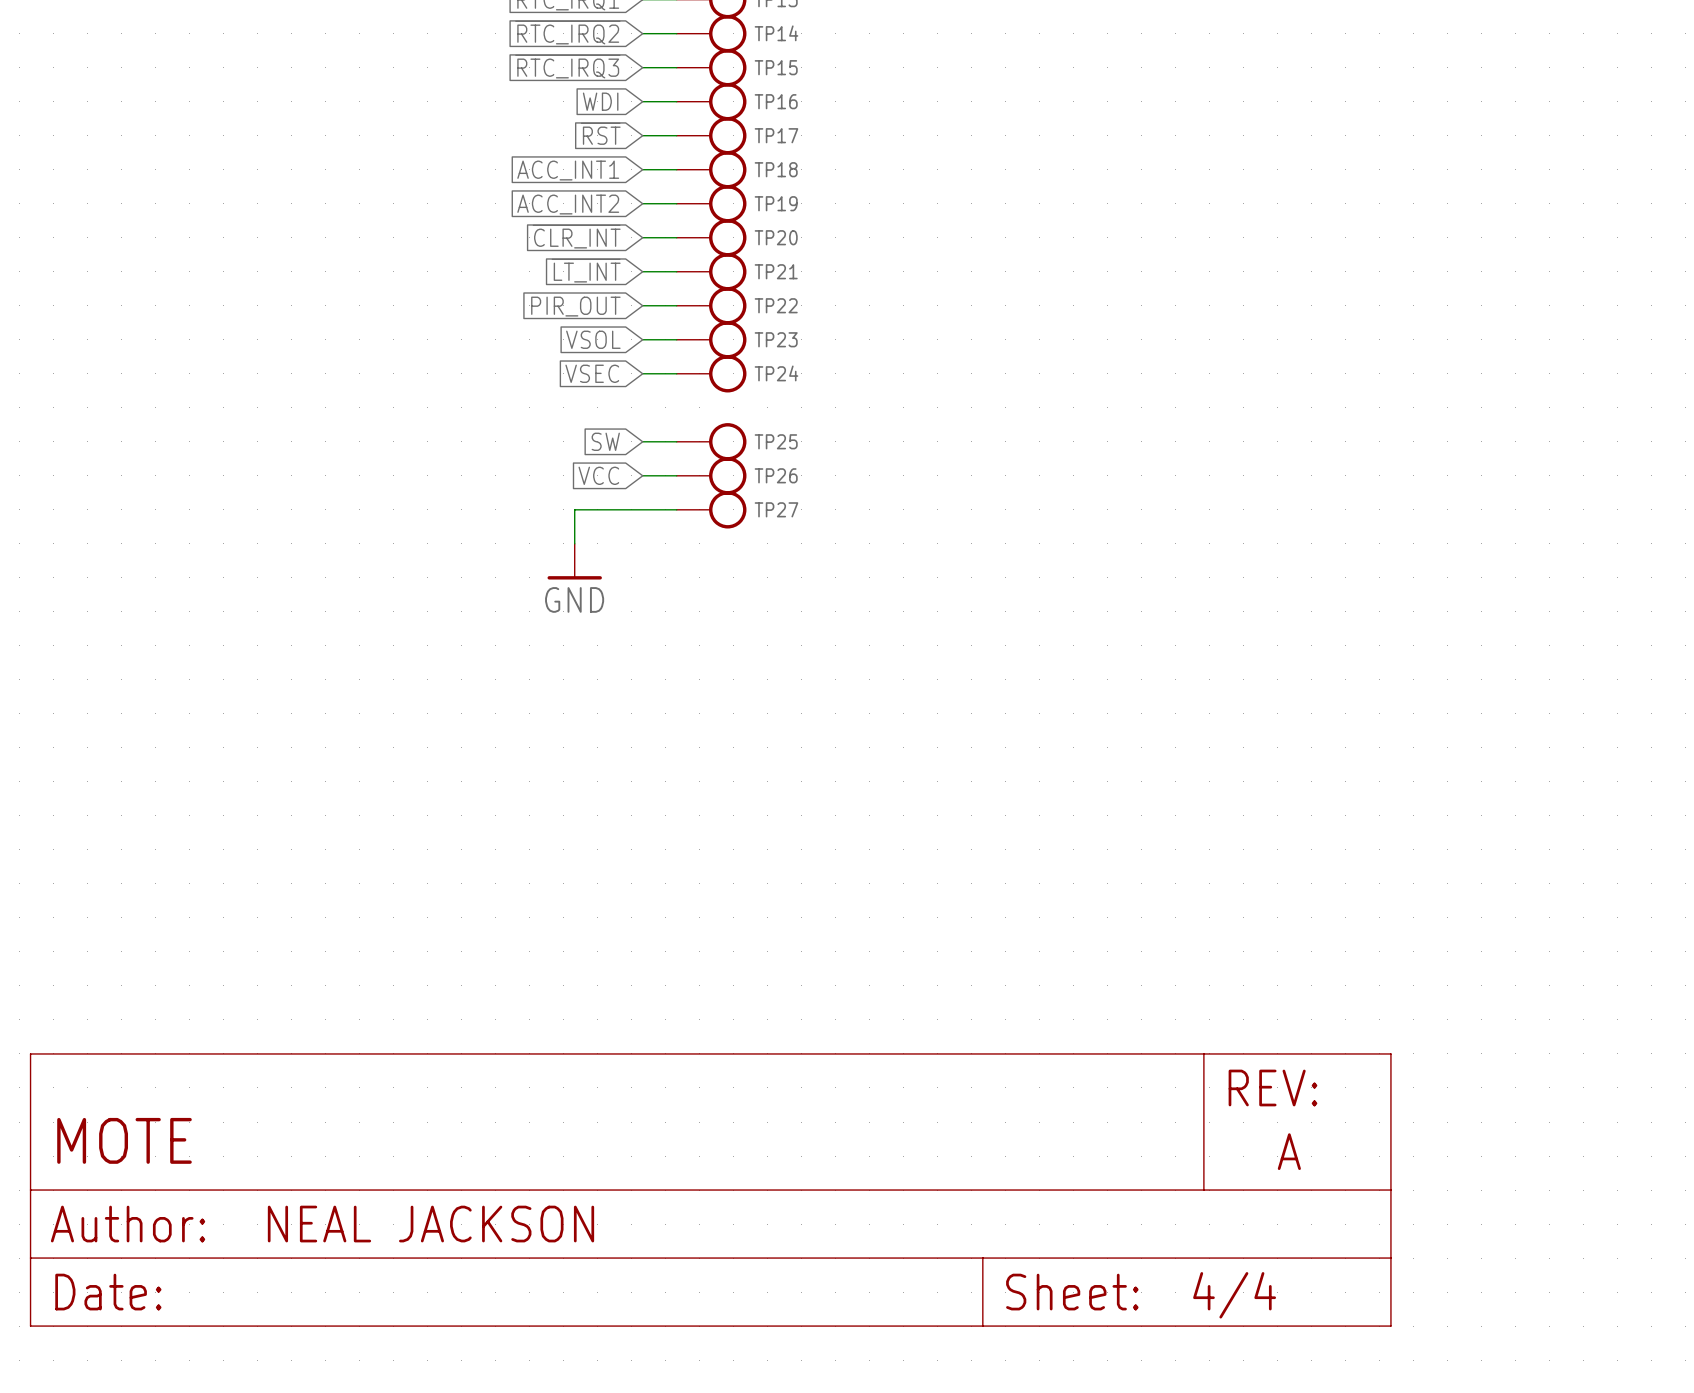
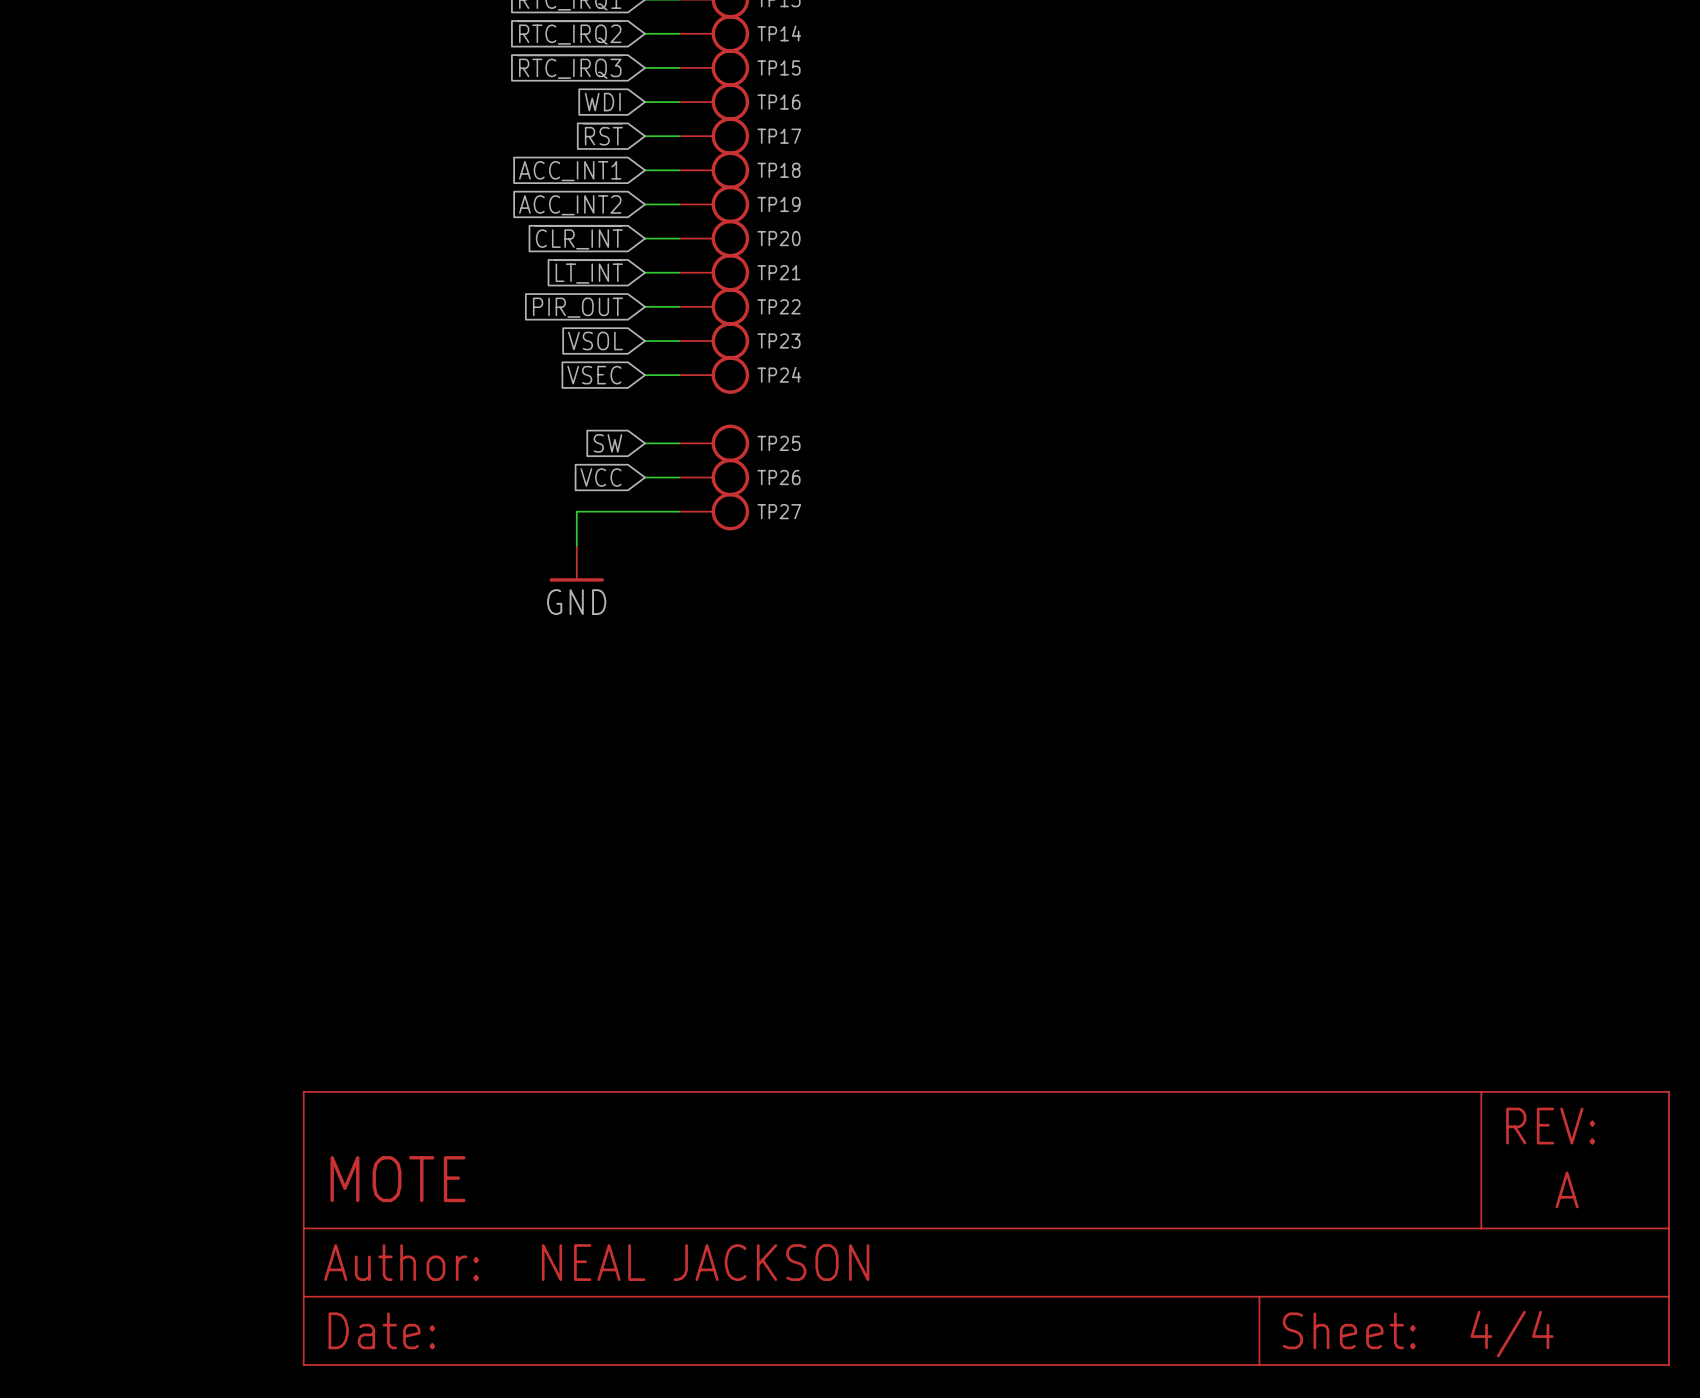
part position: (710, 1190) -> (986, 1228)

